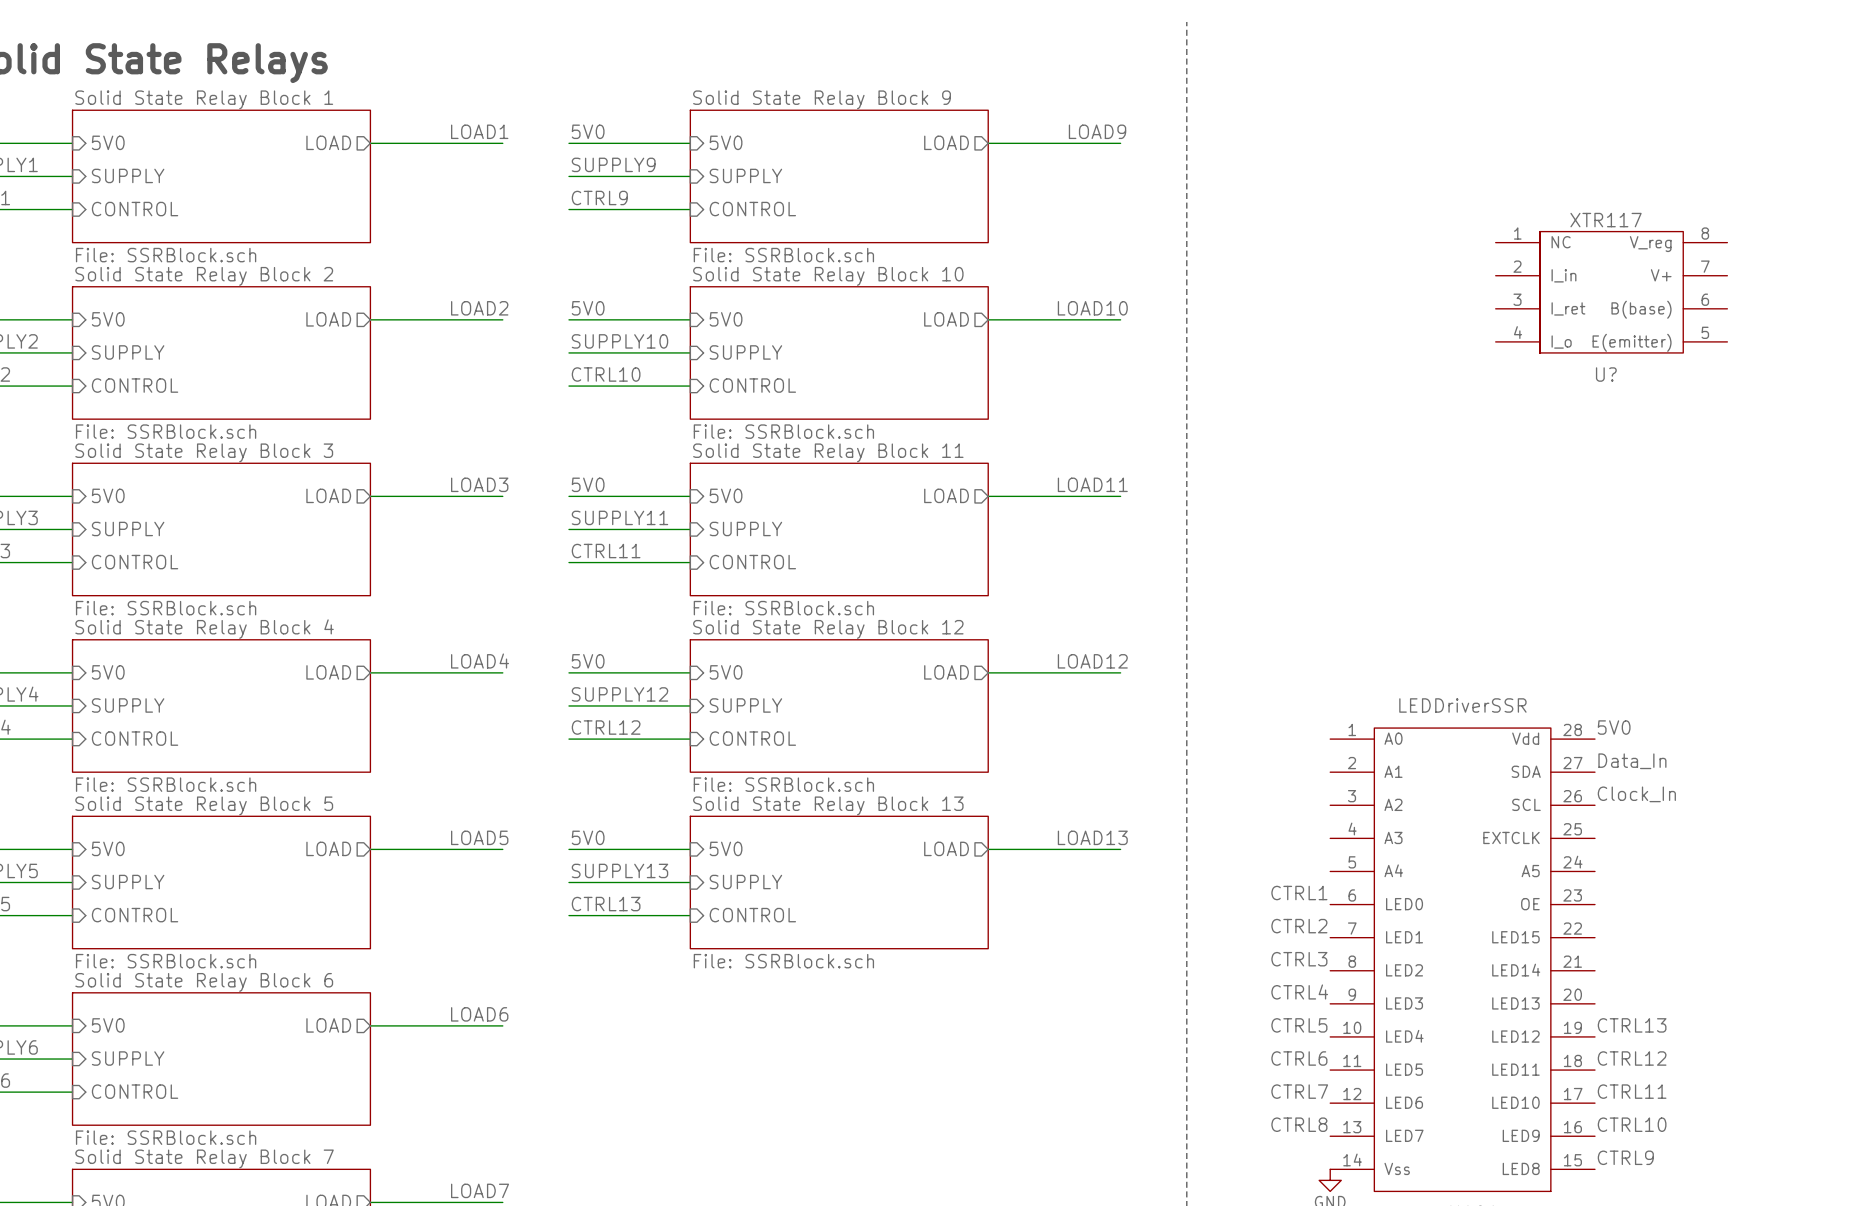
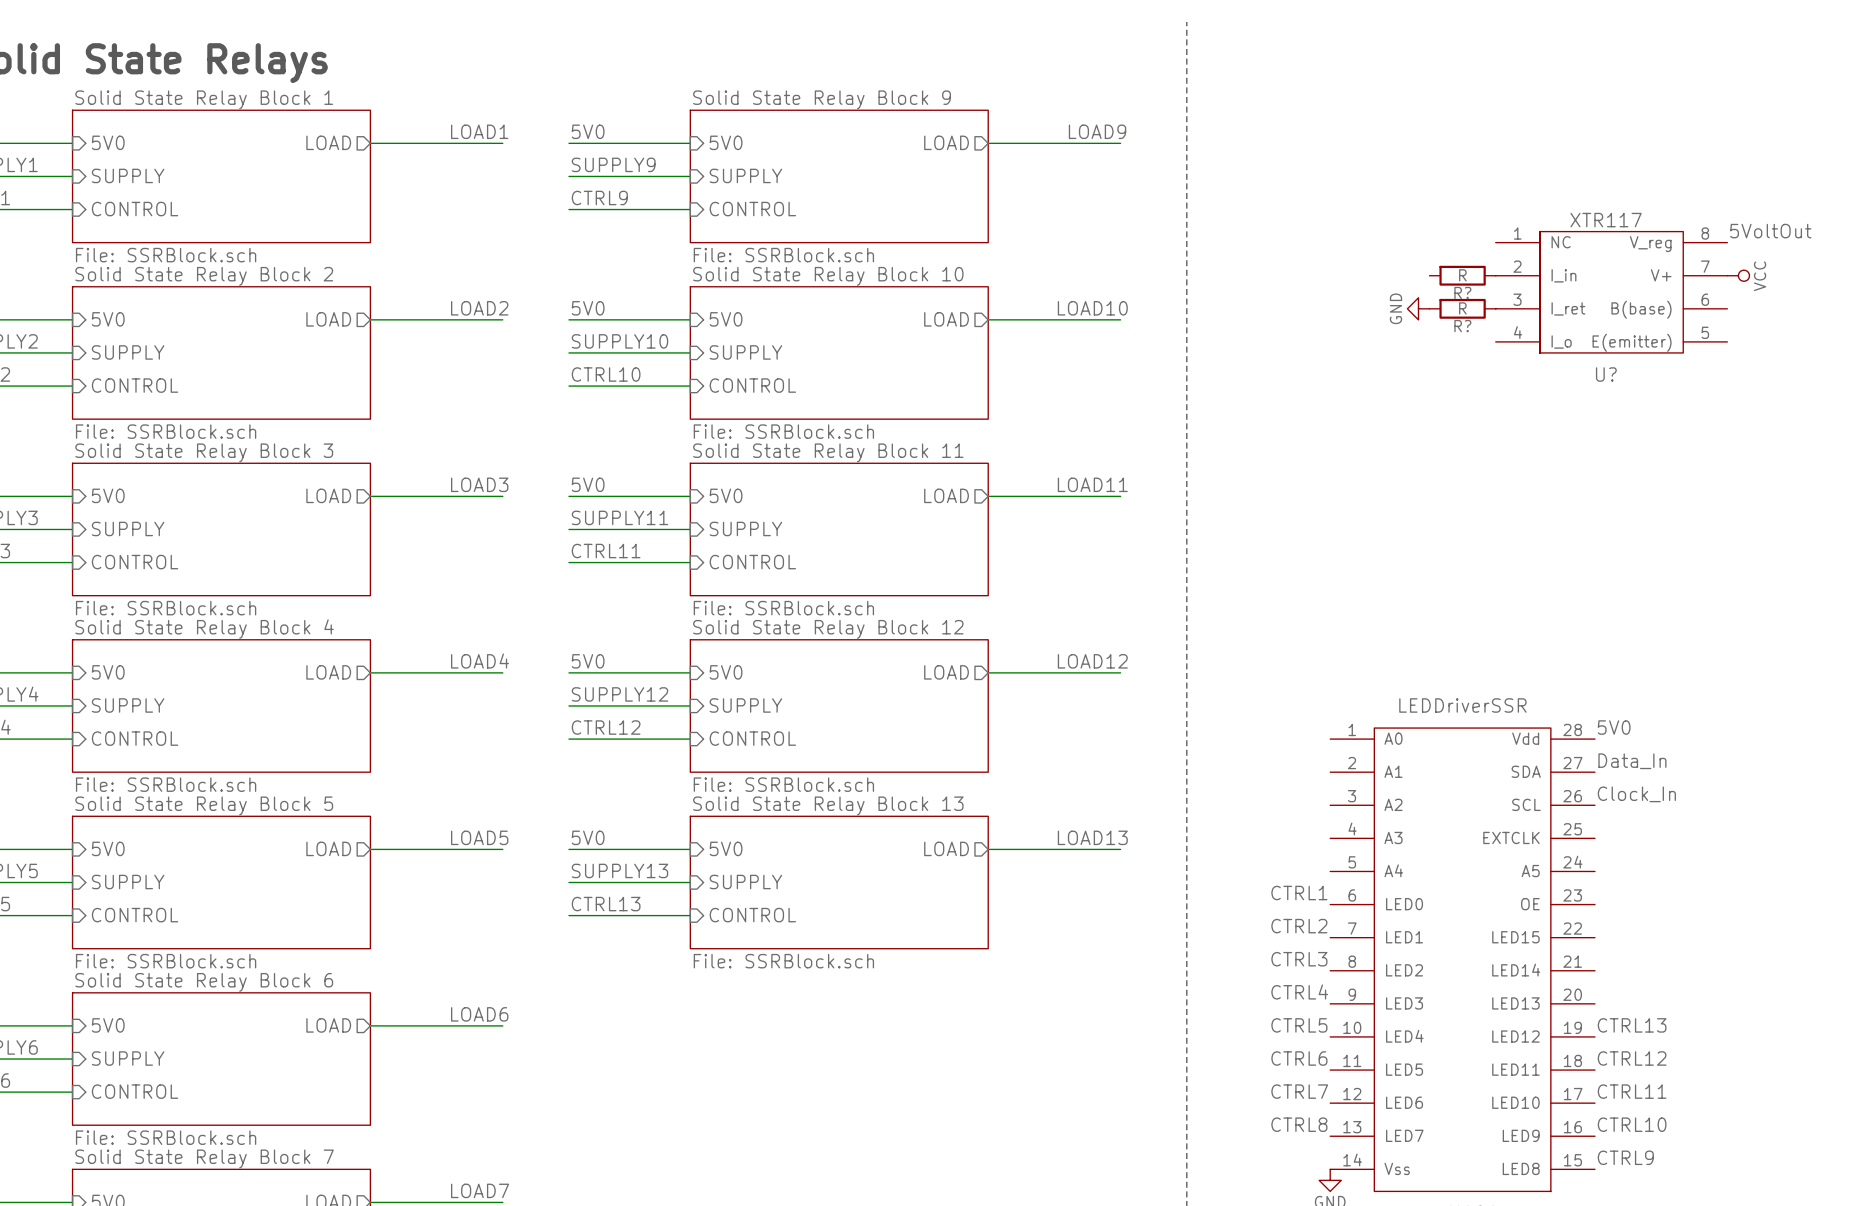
label: none -> 5VoltOut (1770, 231)
R?: none -> R (1462, 275)
power symbol: none -> VCC (1738, 275)
power symbol: none -> GND (1418, 308)
R?: none -> R (1462, 308)

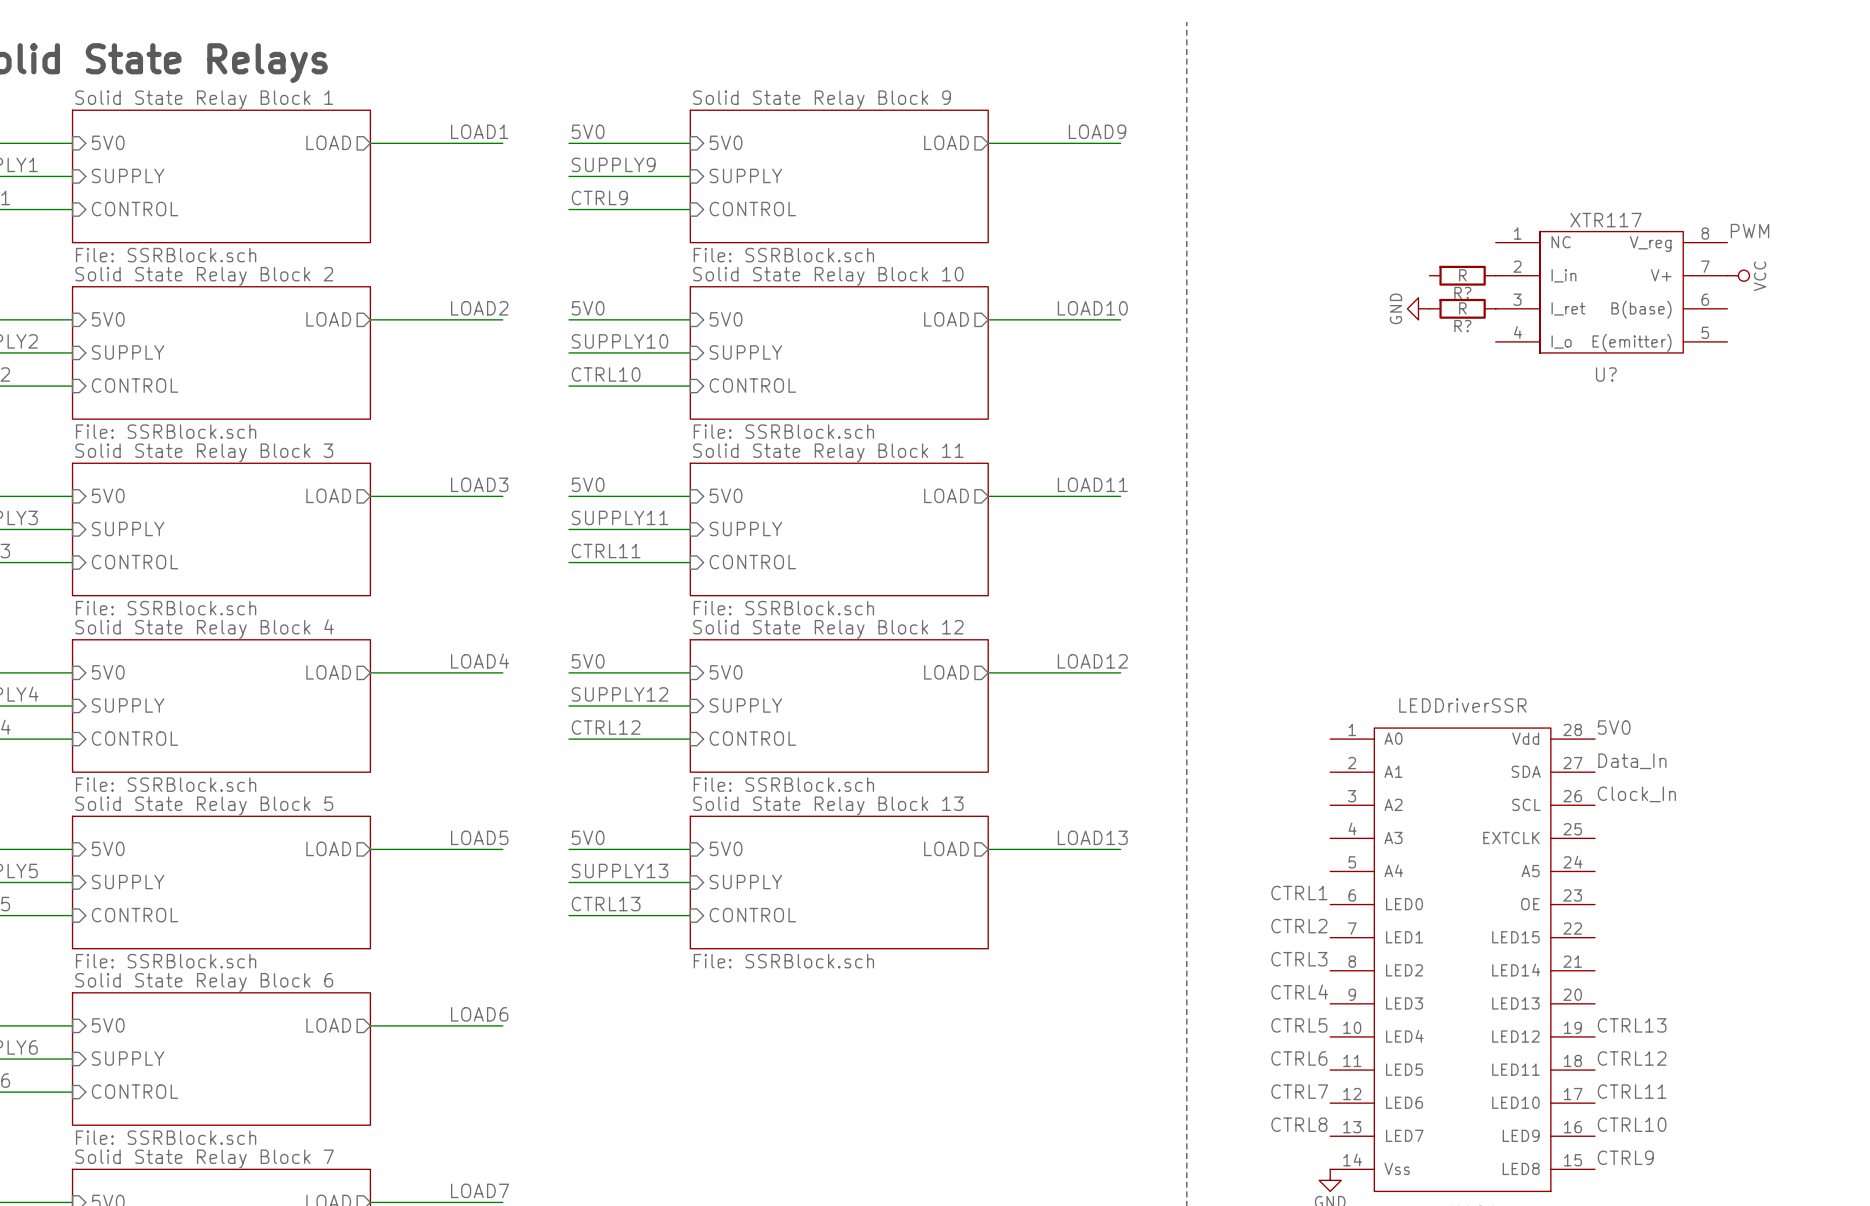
label: 5VoltOut (1770, 231) -> PWM (1750, 231)

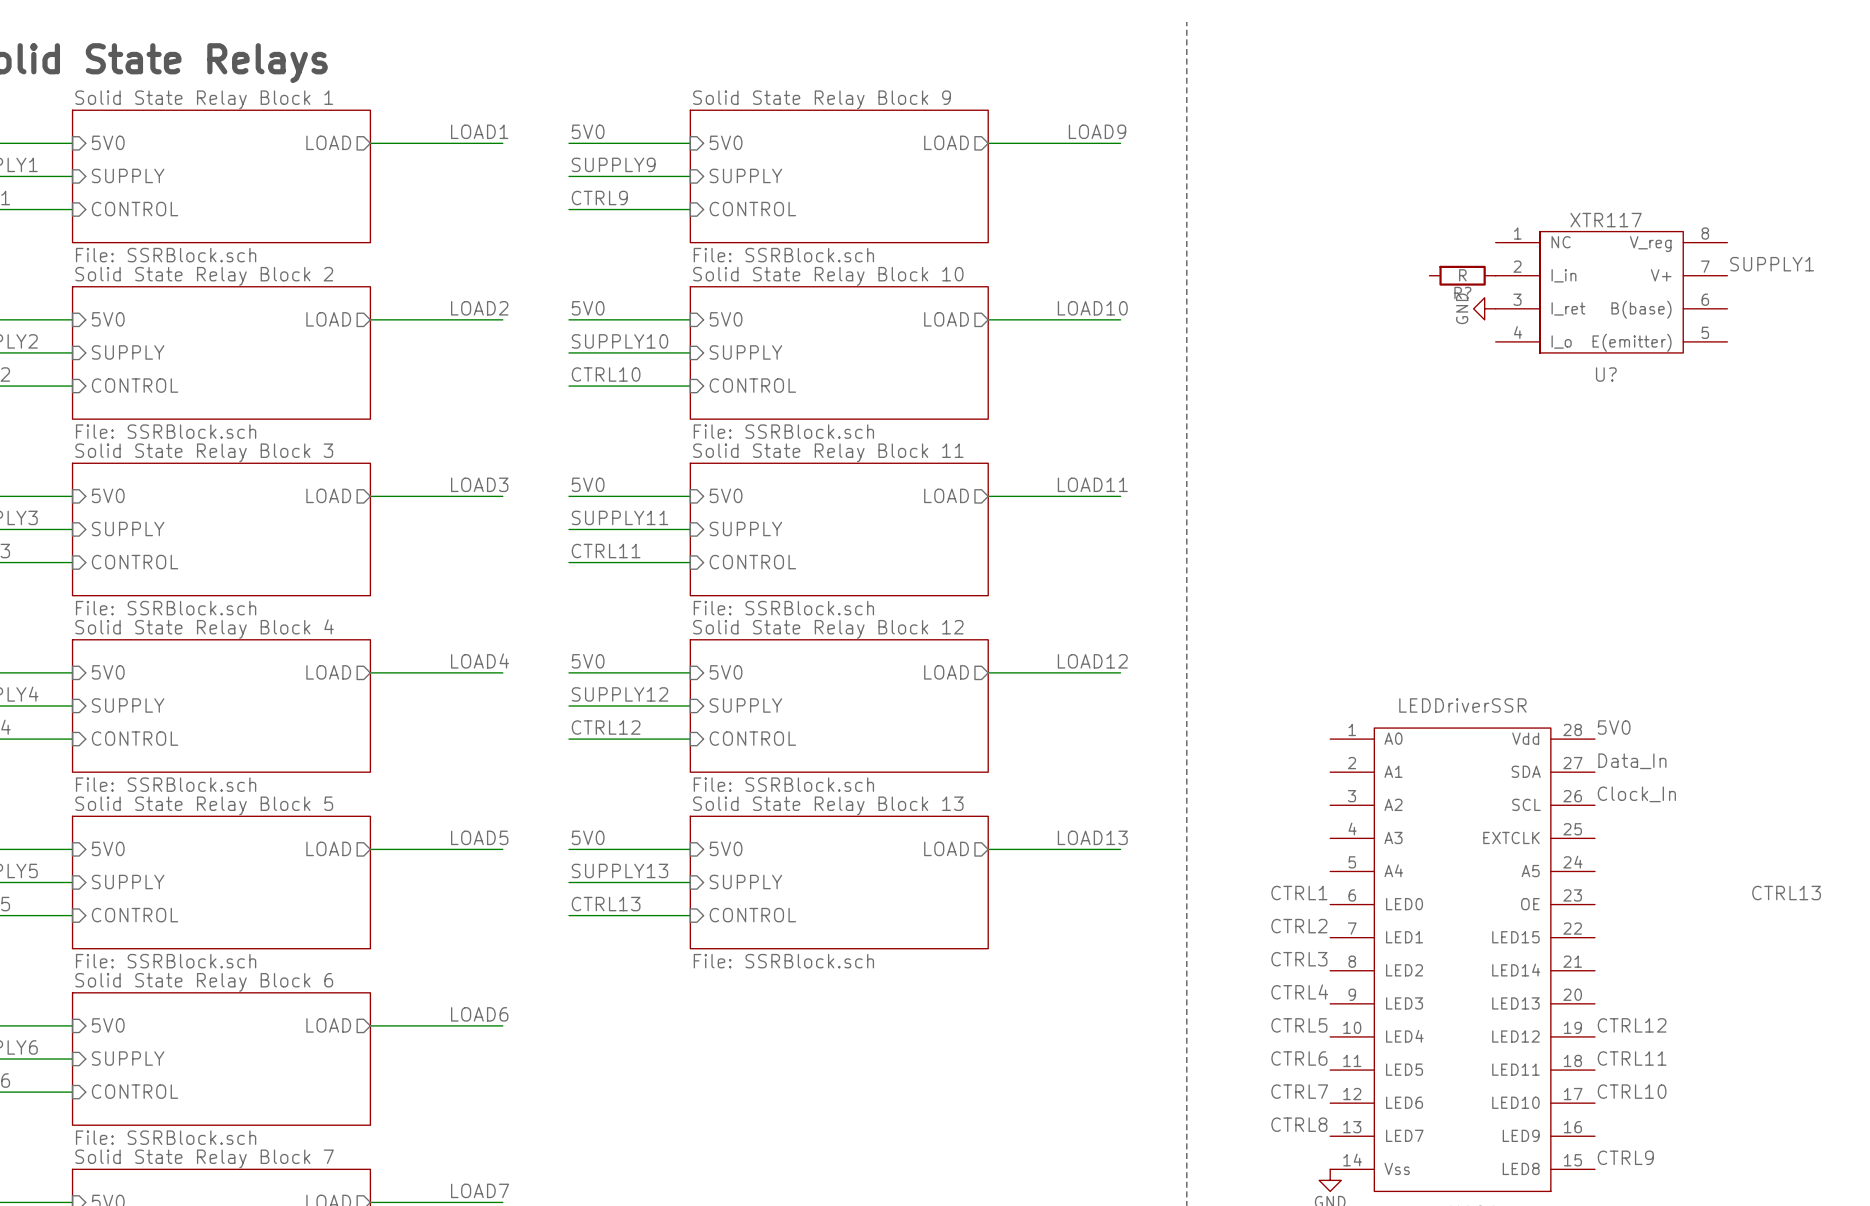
label: PWM (1750, 231) -> none
label: none -> SUPPLY1 (1772, 264)
power symbol: VCC (1738, 275) -> none
power symbol position: GND (1418, 308) -> GND (1484, 308)
R?: R (1462, 308) -> none
label: none -> CTRL13 (1786, 893)
label: CTRL13 (1632, 1025) -> CTRL12 (1632, 1025)
label: CTRL12 (1632, 1058) -> CTRL11 (1632, 1058)
label: CTRL11 (1632, 1091) -> CTRL10 (1632, 1091)
label: CTRL10 (1632, 1124) -> none

